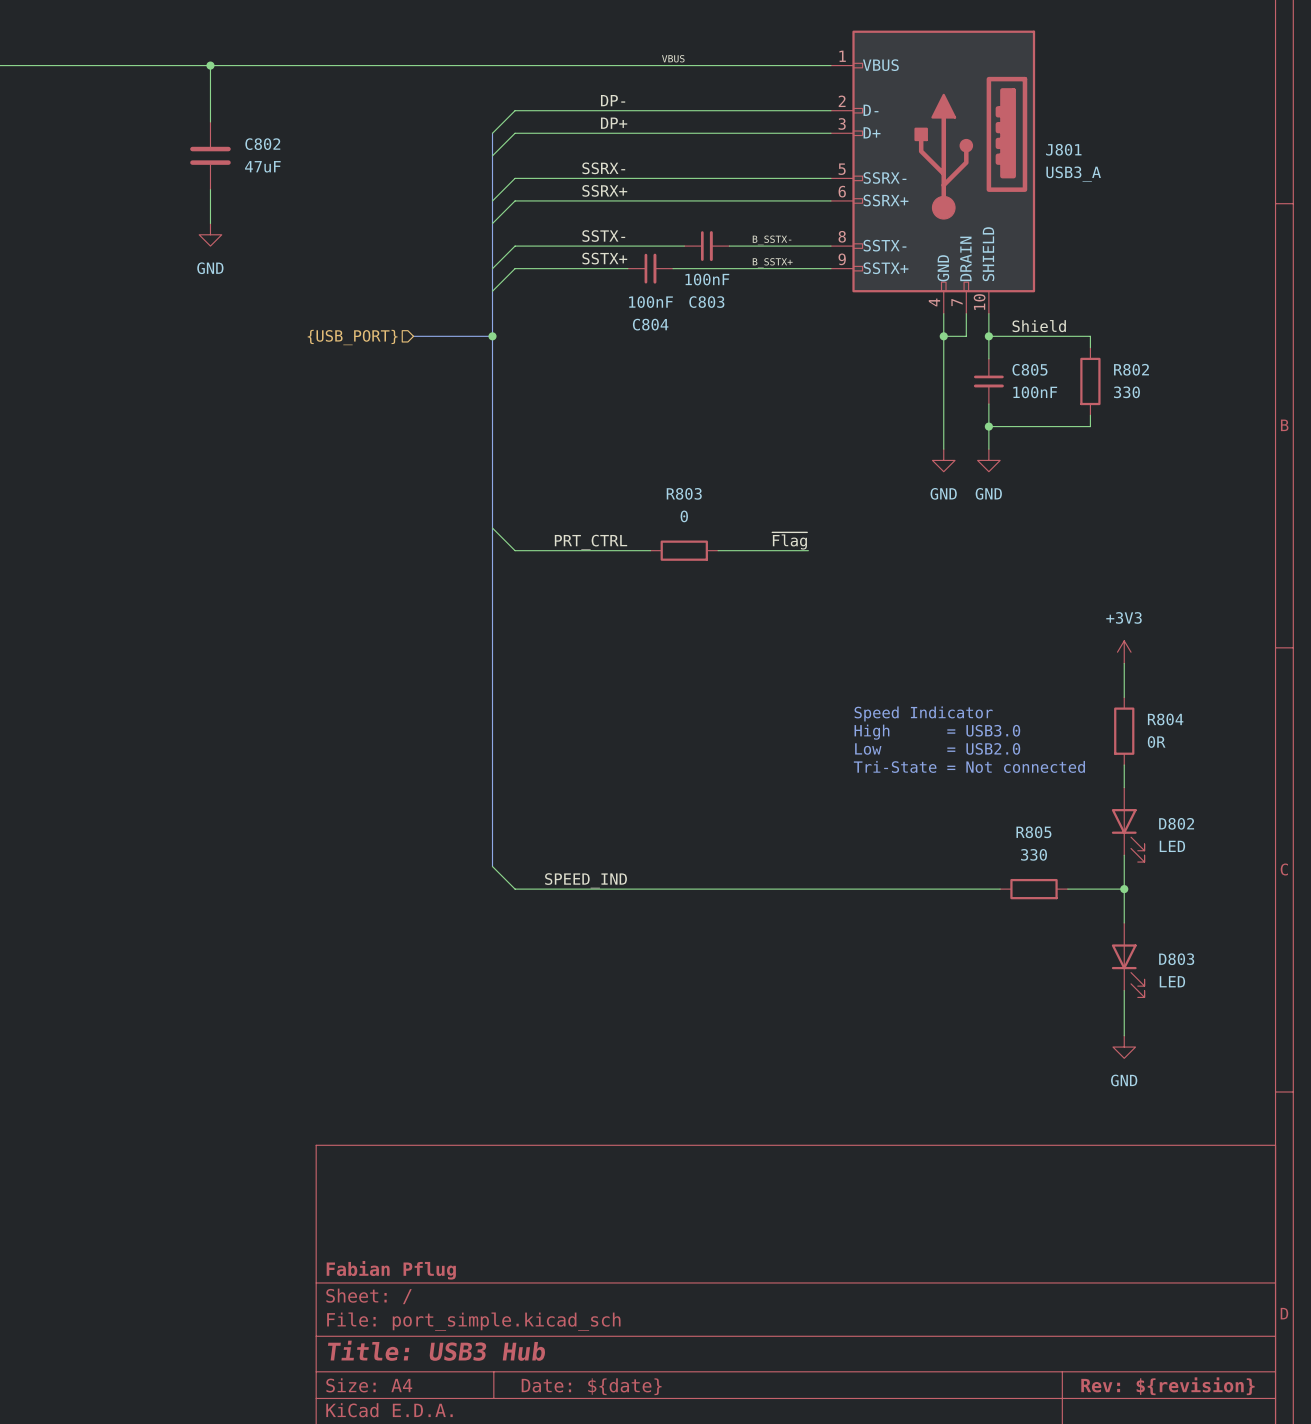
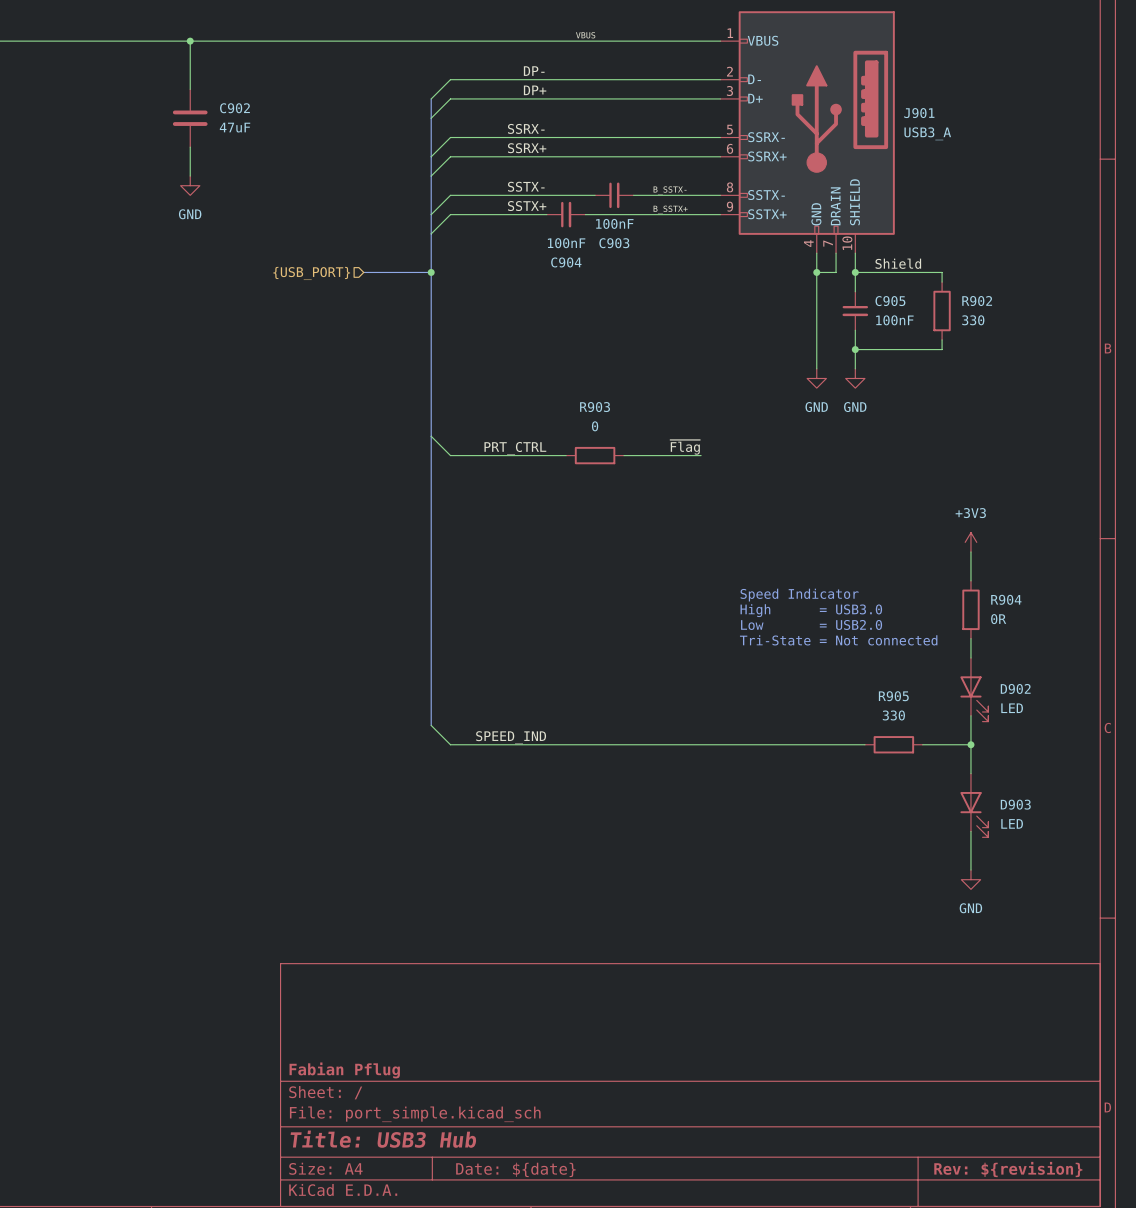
C802 name: C802 (262, 144) -> C902 (234, 108)
J801 name: J801 (1063, 149) -> J901 (919, 113)
C803 name: C803 (706, 302) -> C903 (614, 243)
C804 name: C804 (650, 324) -> C904 (566, 262)
C805 name: C805 (1029, 369) -> C905 (890, 301)
R802 name: R802 (1131, 369) -> R902 (977, 301)
R803 name: R803 (684, 493) -> R903 (595, 407)
R804 name: R804 (1165, 719) -> R904 (1006, 599)
D802 name: D802 (1176, 823) -> D902 (1015, 688)
R805 name: R805 (1033, 832) -> R905 (893, 696)
D803 name: D803 (1176, 959) -> D903 (1015, 804)

